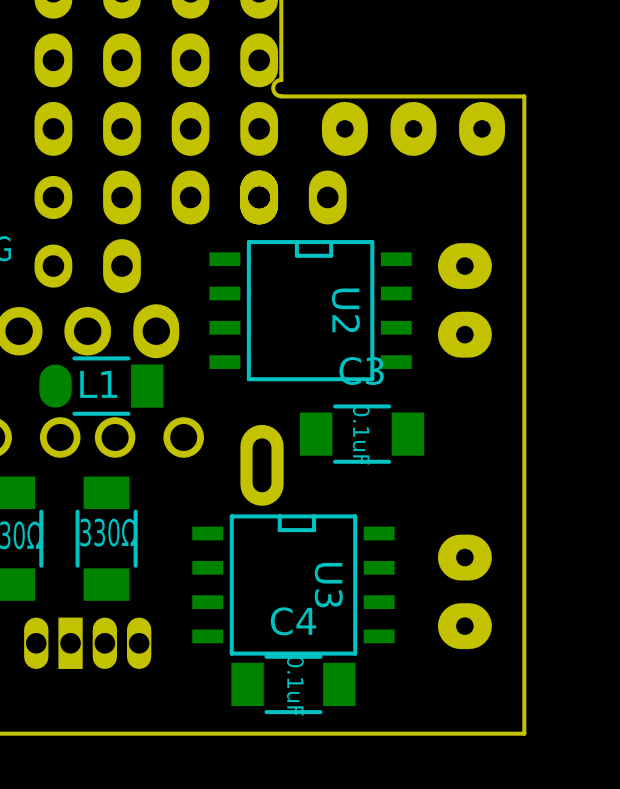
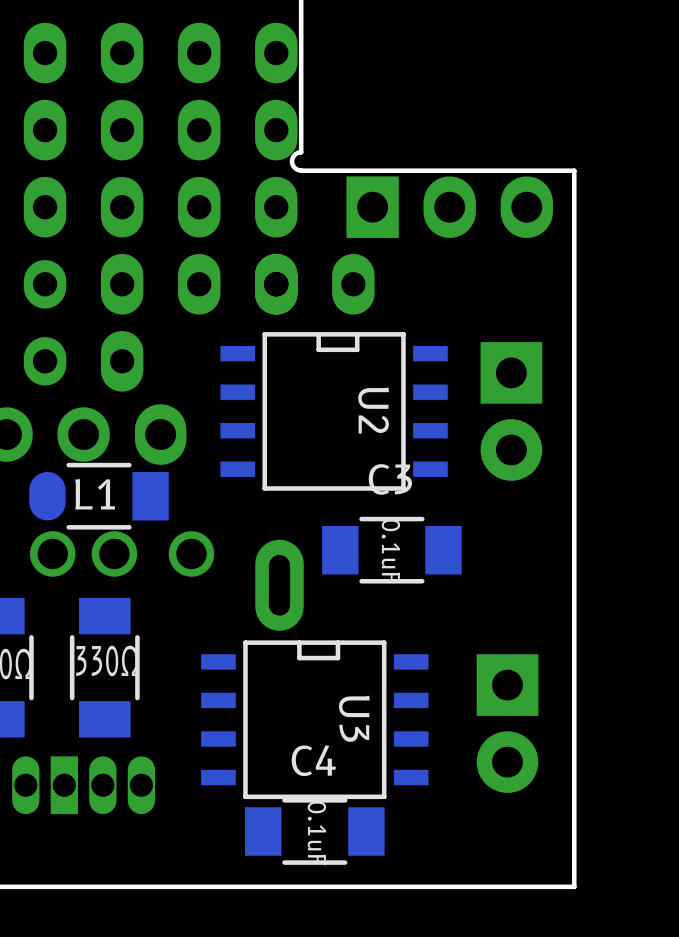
part footprint: [321, 101, 506, 156] -> [346, 176, 553, 239]
part footprint: [437, 243, 492, 358] -> [480, 342, 543, 481]
part footprint: [437, 534, 492, 650] -> [476, 654, 539, 793]

